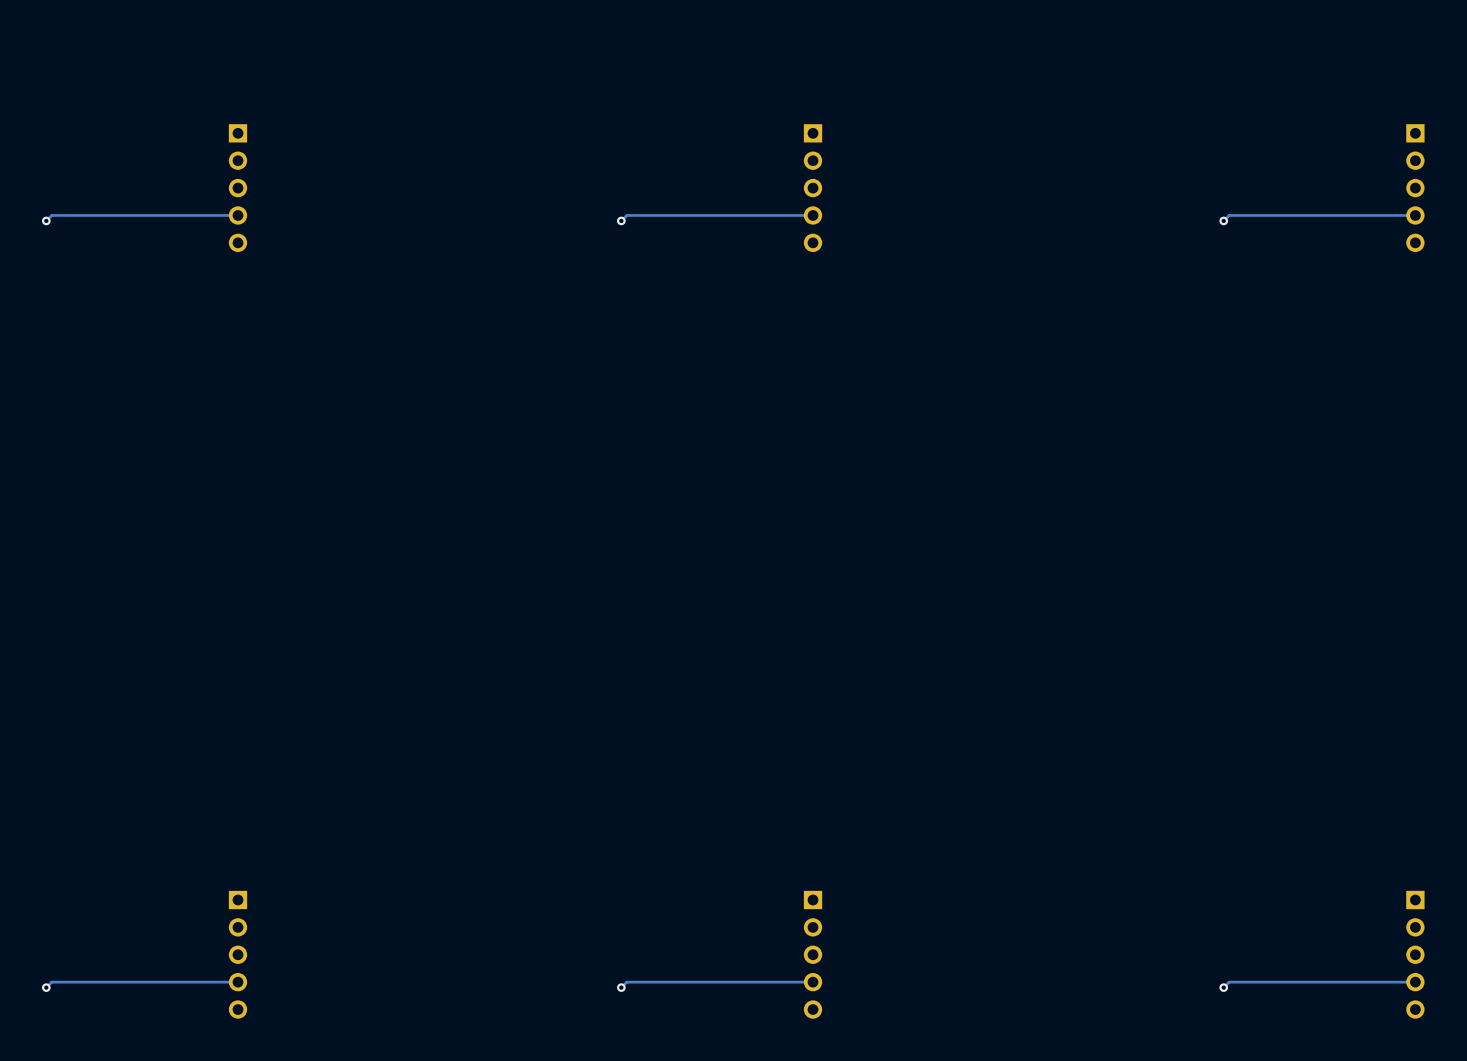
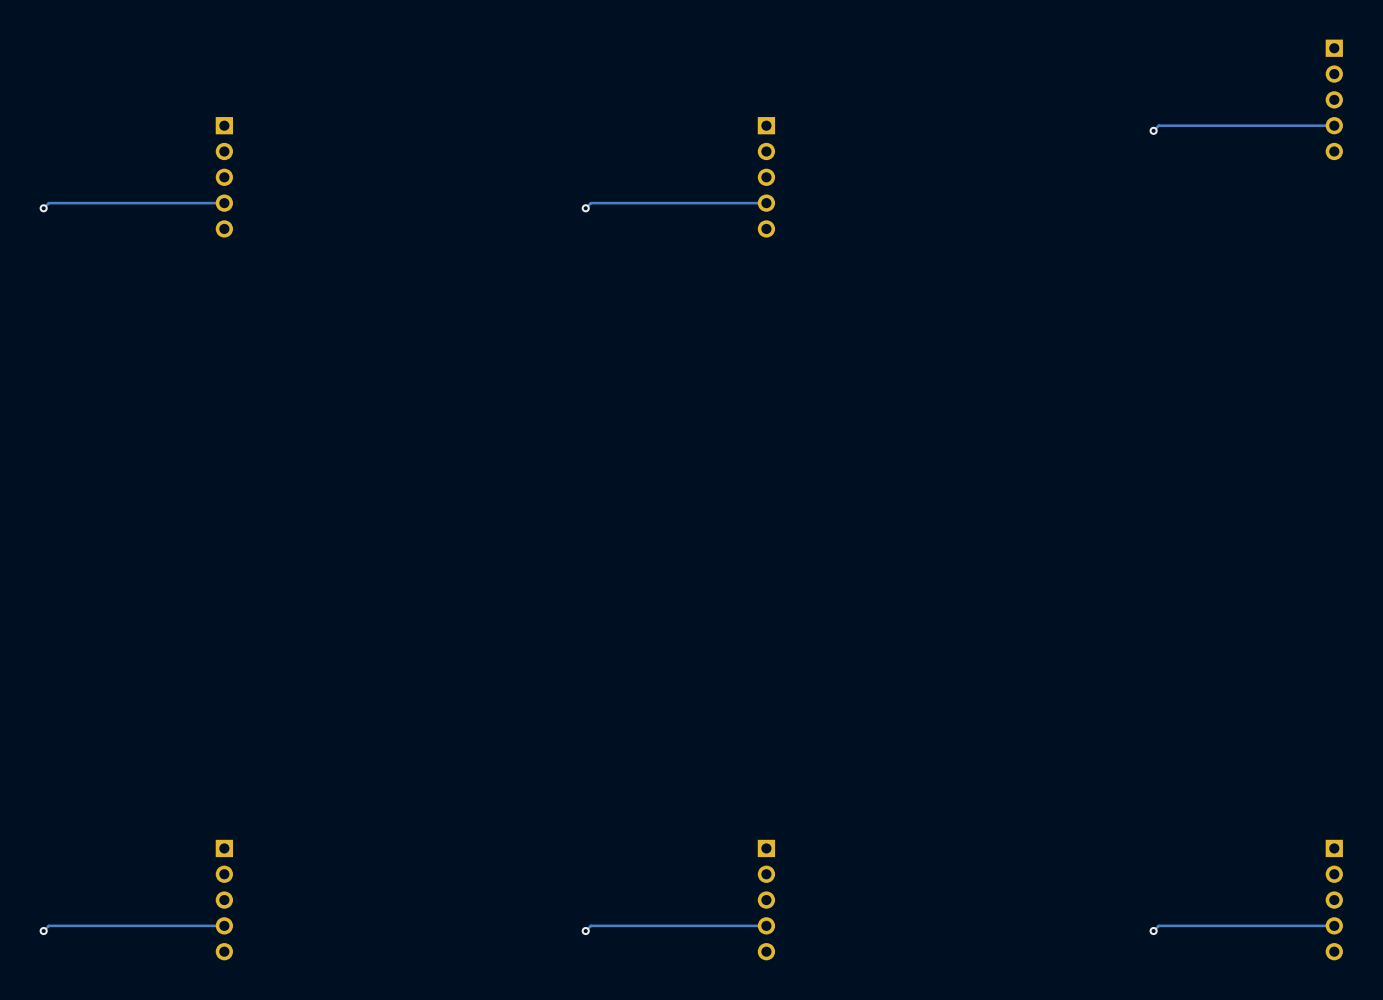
via: none -> (1153, 130)
part position: (1415, 188) -> (1334, 99)
track: (1415, 215) (1229, 215) (1223, 220) -> (1334, 125) (1158, 125) (1153, 130)
via: (1223, 220) -> none

